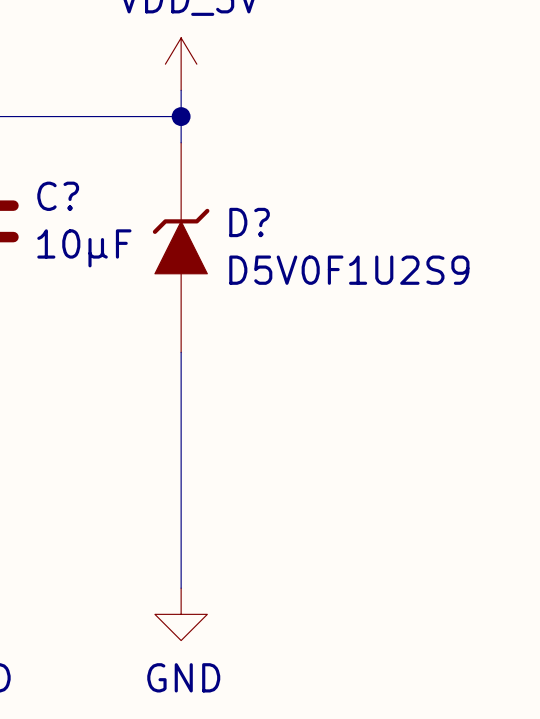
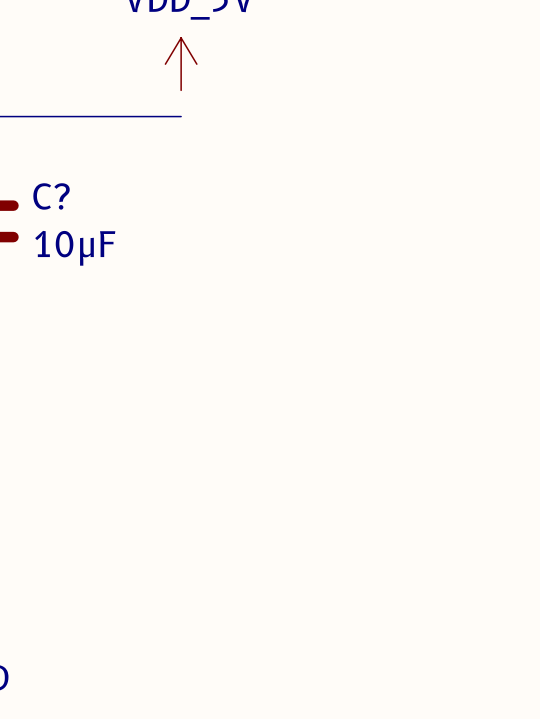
wire: (181, 90) (181, 142) -> none
junction: (181, 116) -> none
D?: D5V0F1U2S9 (181, 247) -> none
wire: (181, 352) (181, 588) -> none
power symbol: GND (181, 614) -> none

